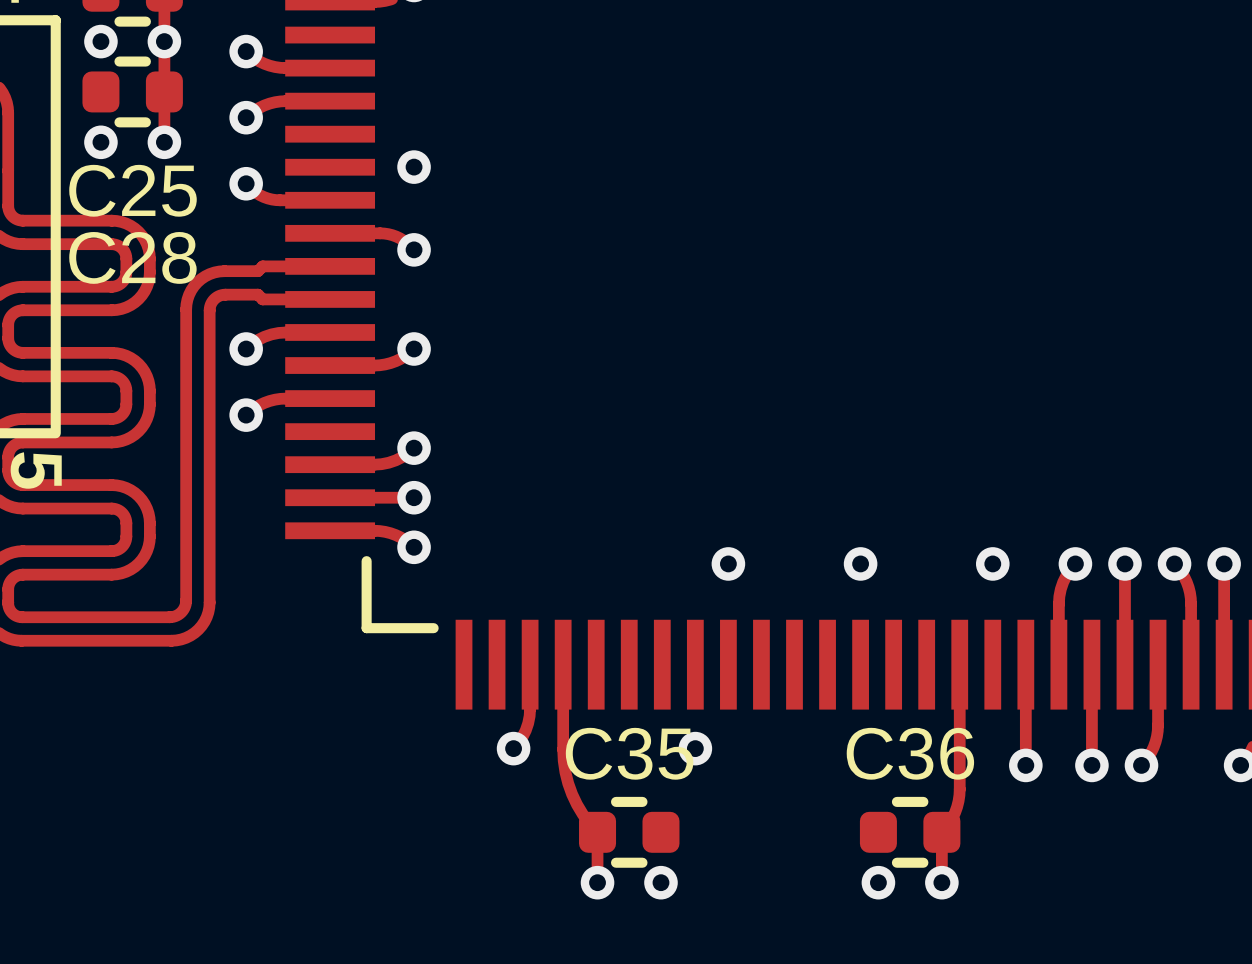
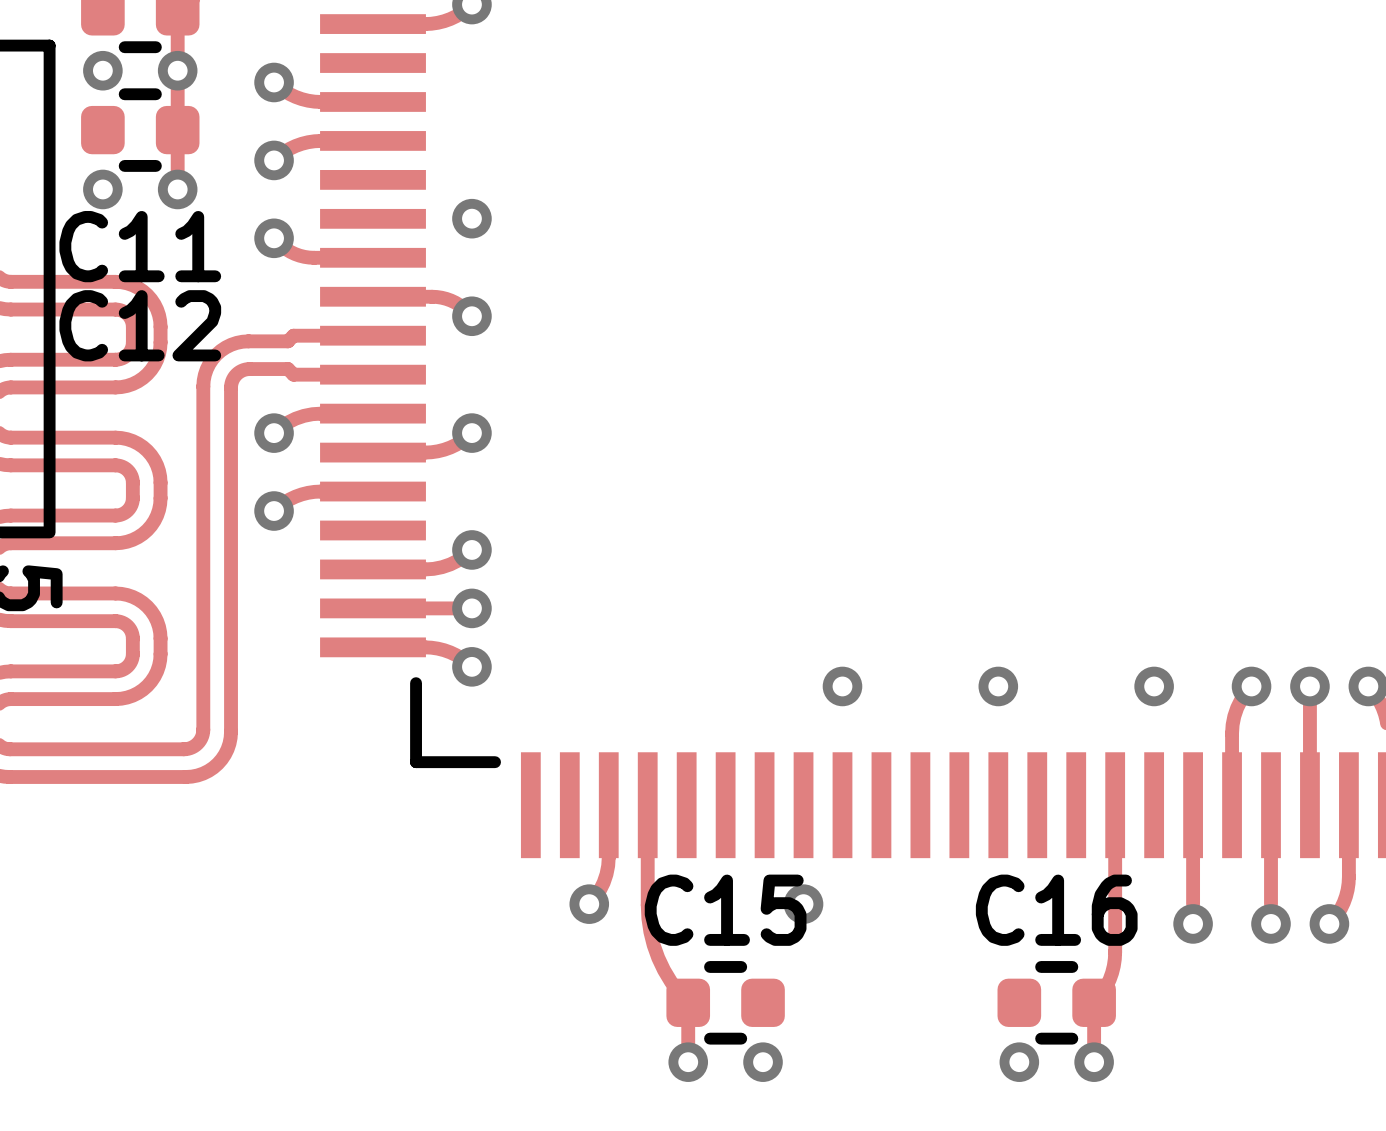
C25 name: C25 (133, 190) -> C11 (140, 246)
C28 name: C28 (132, 257) -> C12 (140, 325)
C35 name: C35 (629, 753) -> C15 (725, 910)
C36 name: C36 (910, 753) -> C16 (1056, 910)

